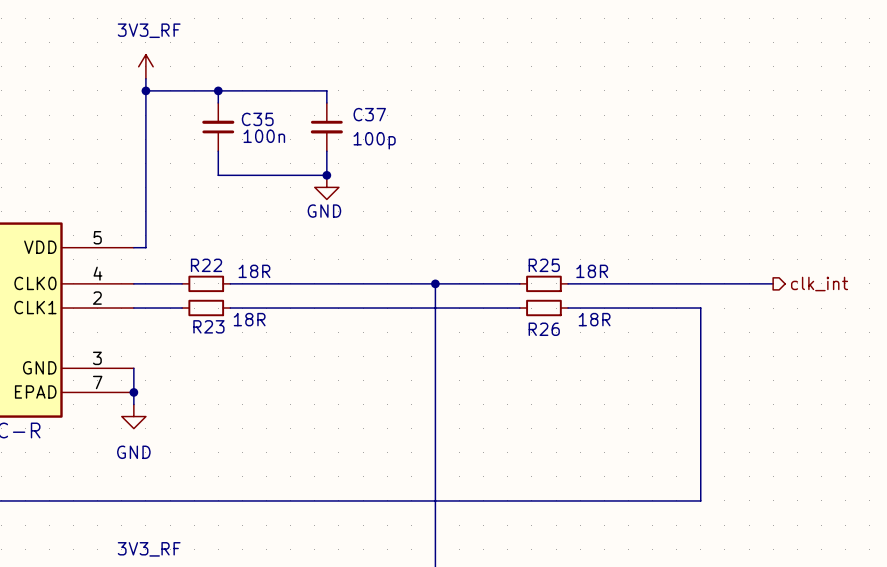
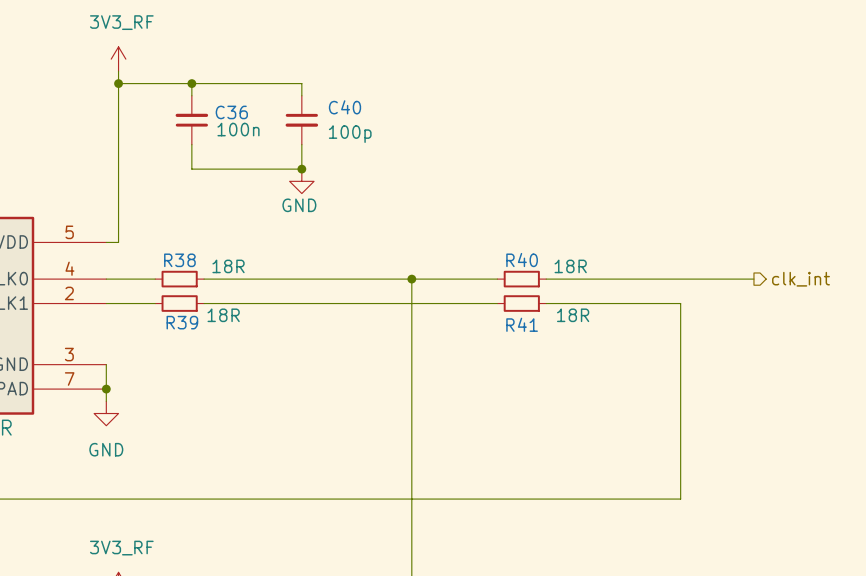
C37 name: C37 (369, 114) -> C40 (344, 107)
C35 name: C35 (257, 119) -> C36 (231, 112)
R22 name: R22 (206, 265) -> R38 (179, 260)
R25 name: R25 (544, 265) -> R40 (522, 260)
R23 name: R23 (208, 326) -> R39 (182, 322)
R26 name: R26 (544, 329) -> R41 (522, 324)

